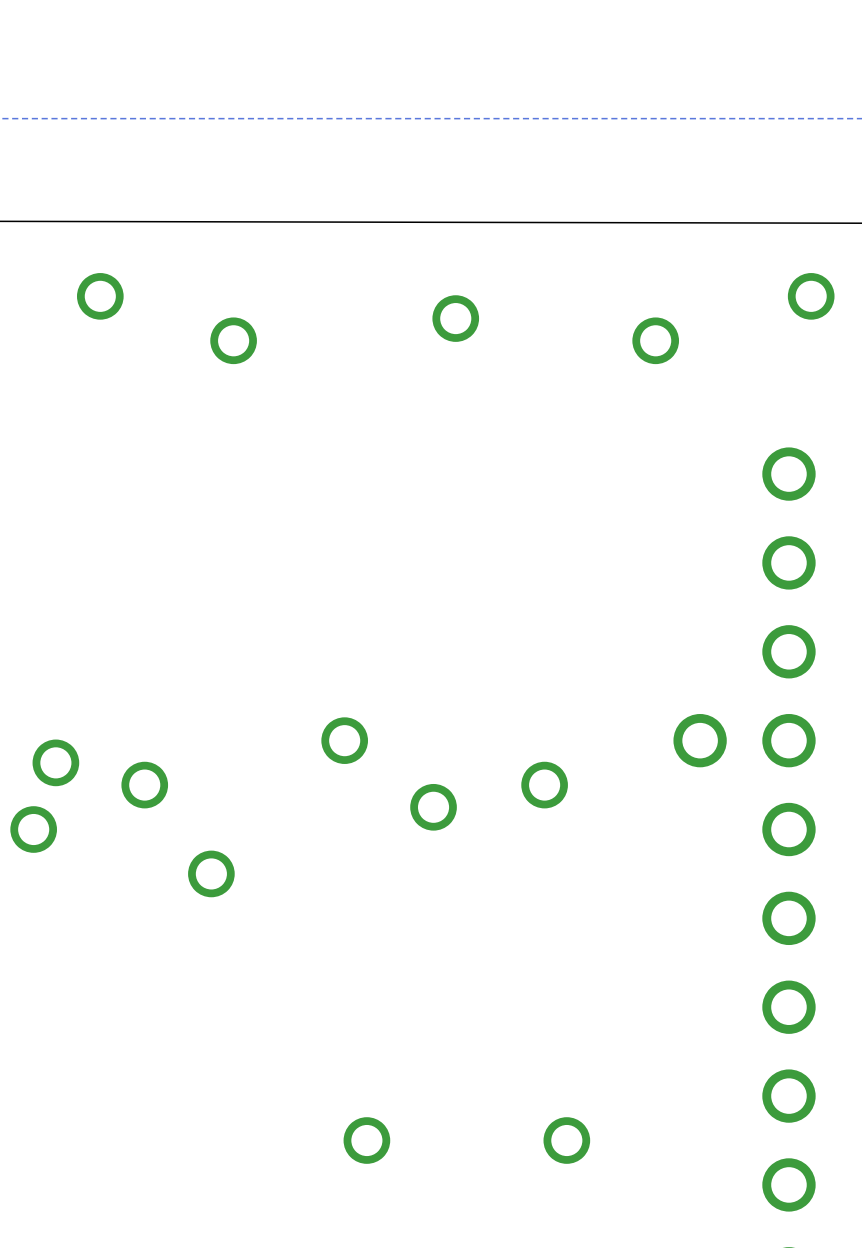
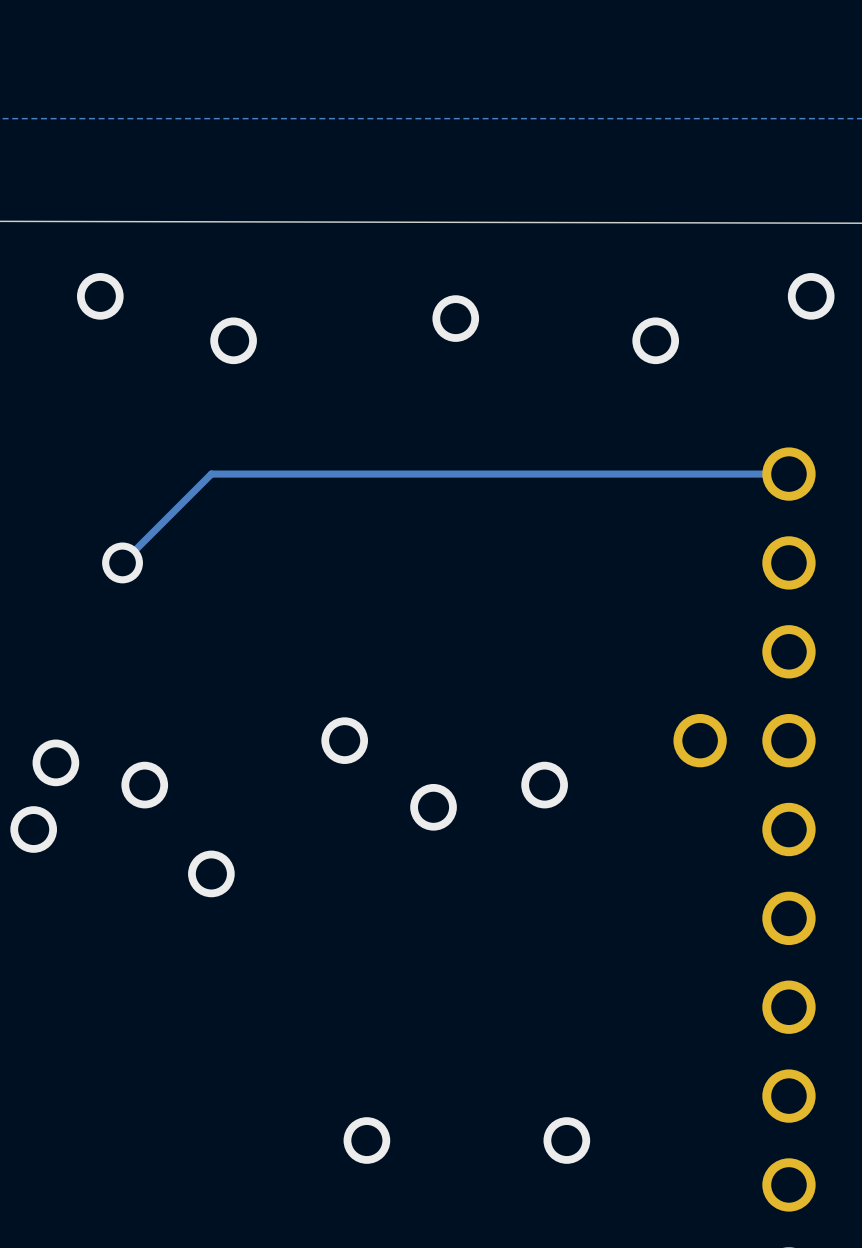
track: none -> (788, 474) (211, 474) (122, 562)
via: none -> (122, 562)

